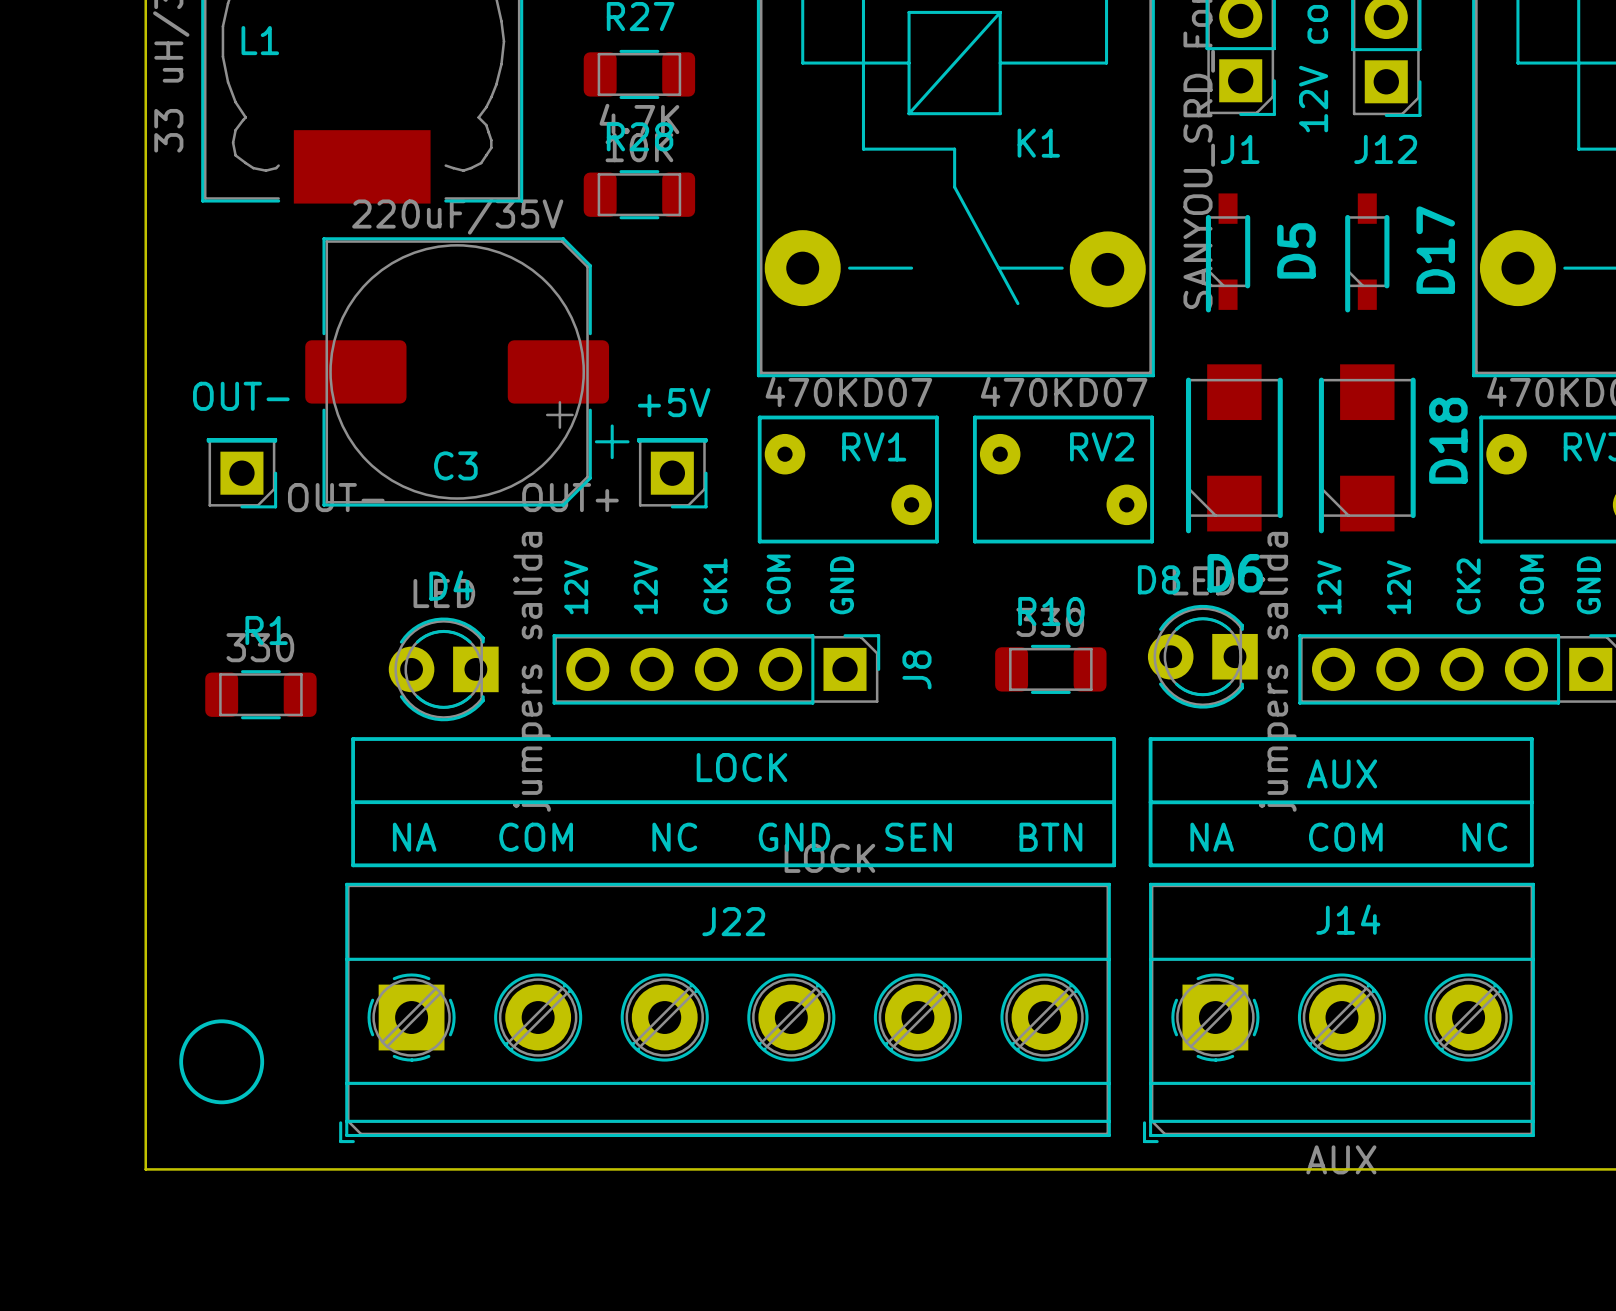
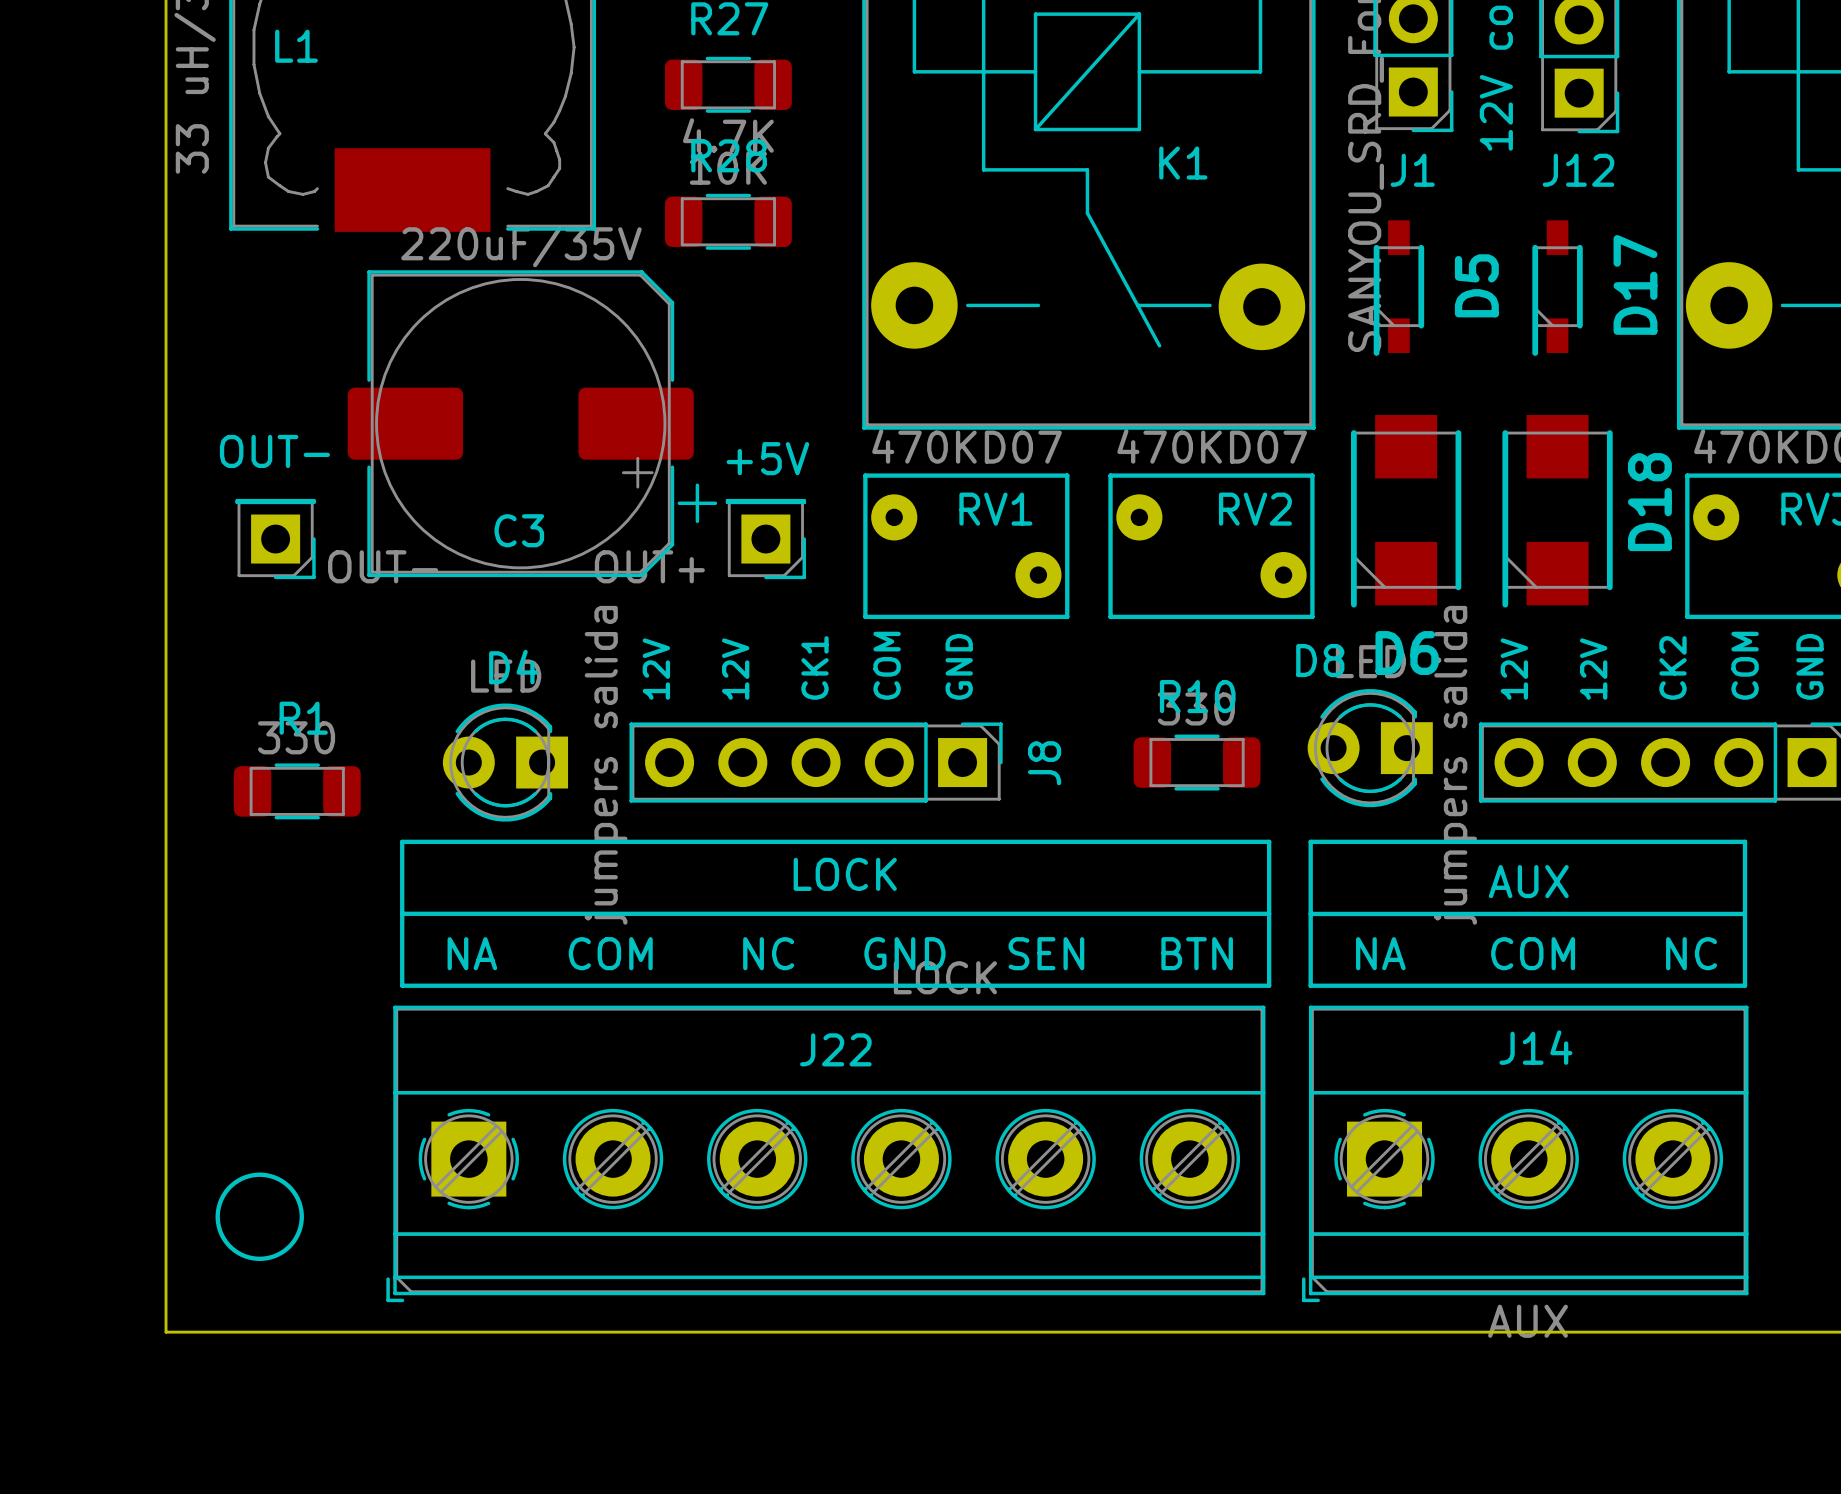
drawing shape: [179, 1019, 265, 1105] -> [215, 1172, 304, 1261]

